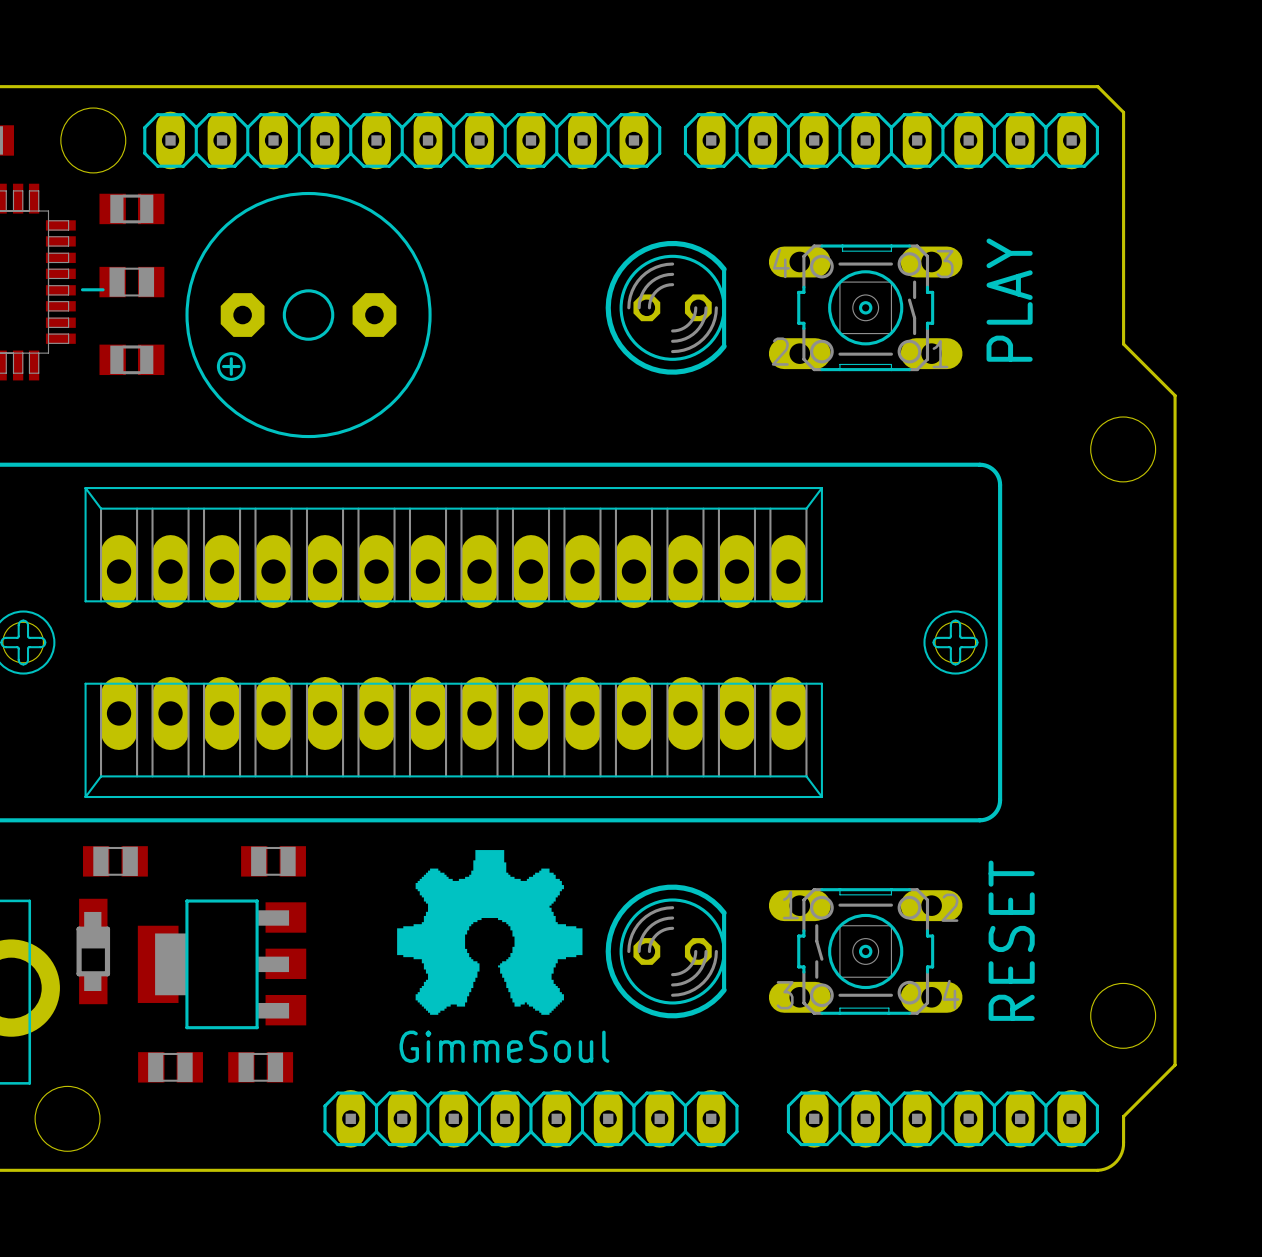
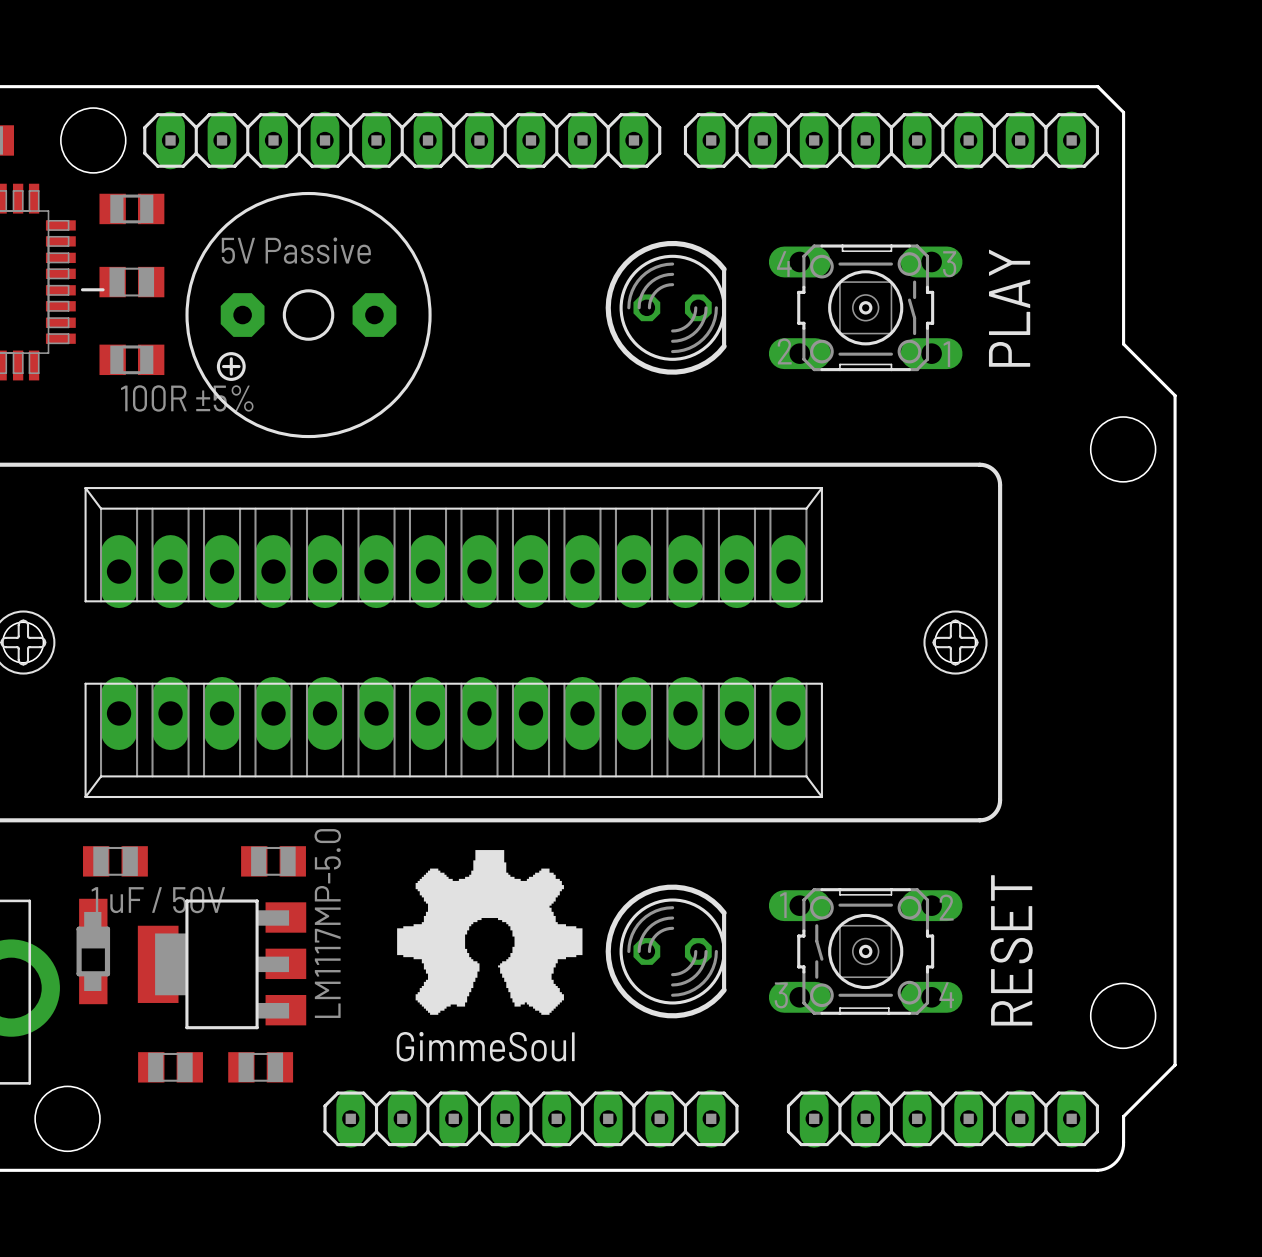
part value: none -> 5V Passive (296, 250)
part value: none -> 100R ±5% (187, 398)
part value: none -> LM1117MP-5.0 (327, 923)
part value: none -> 1 uF / 50V (158, 900)

